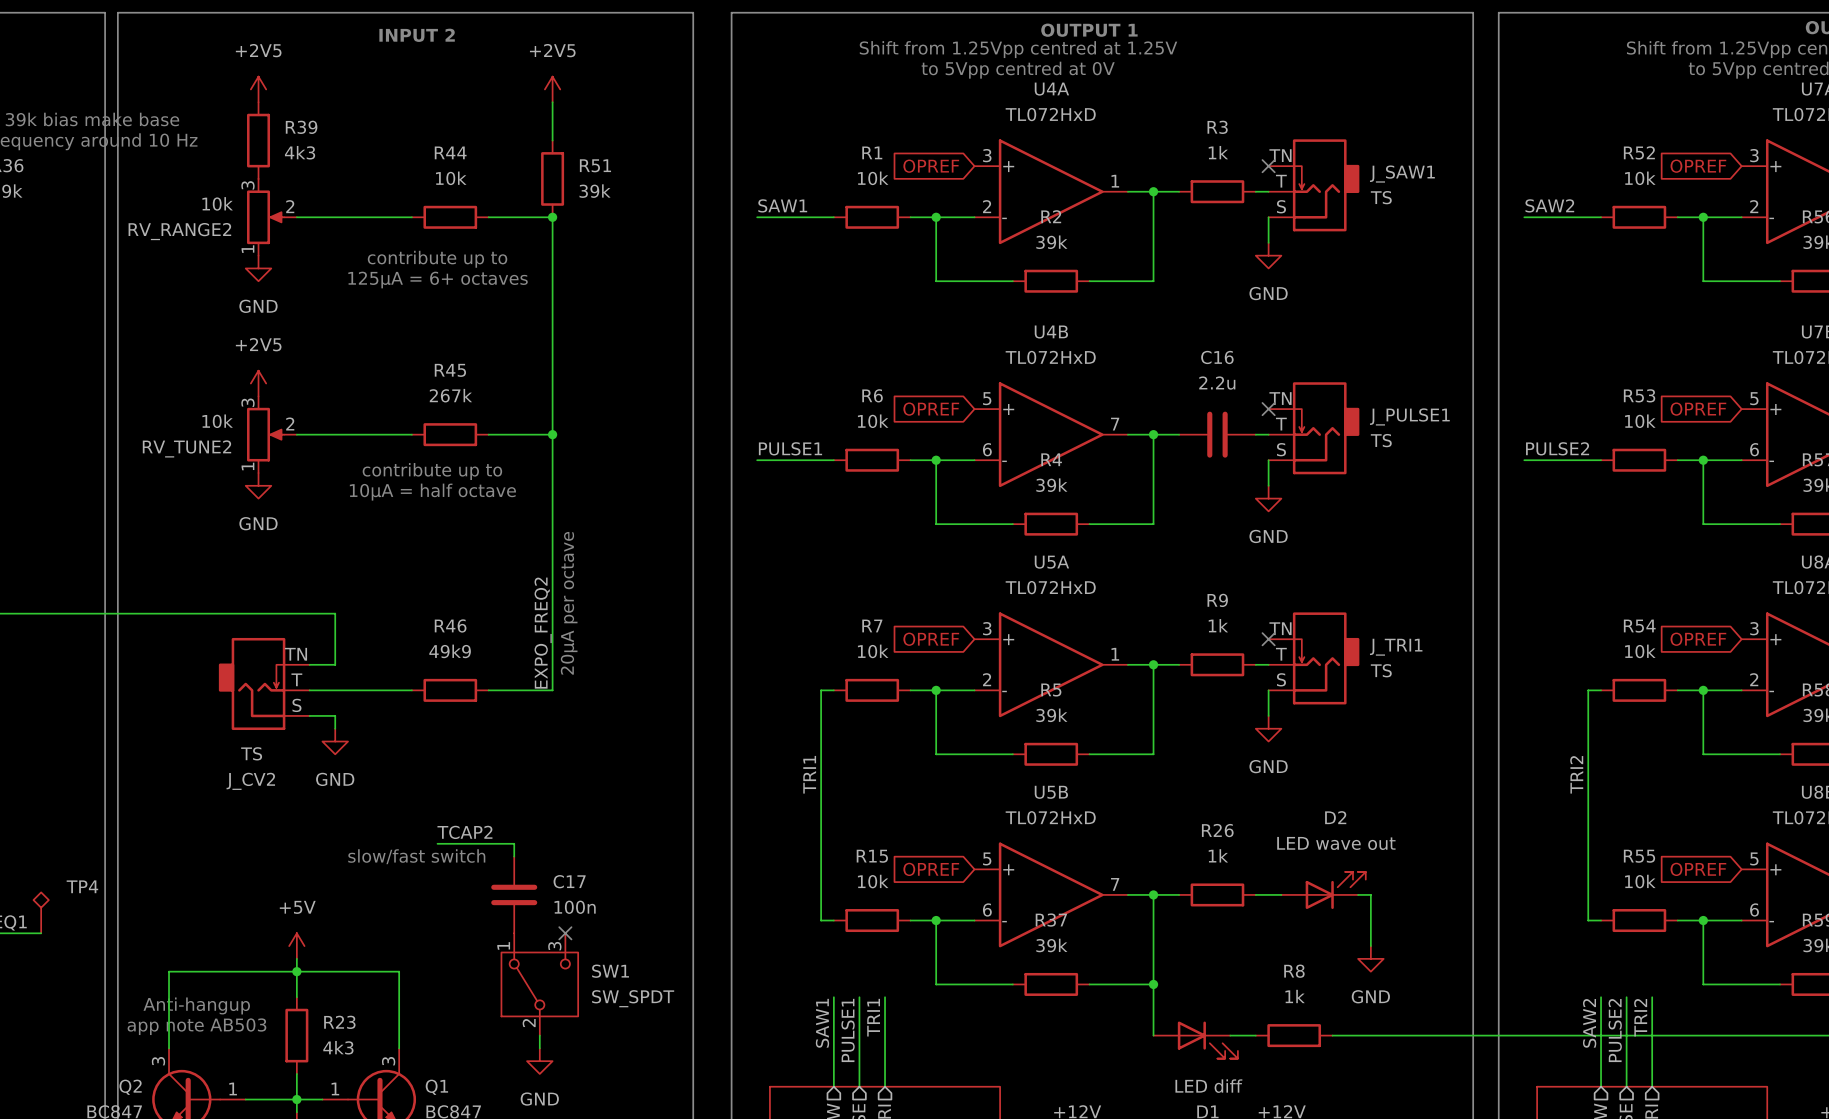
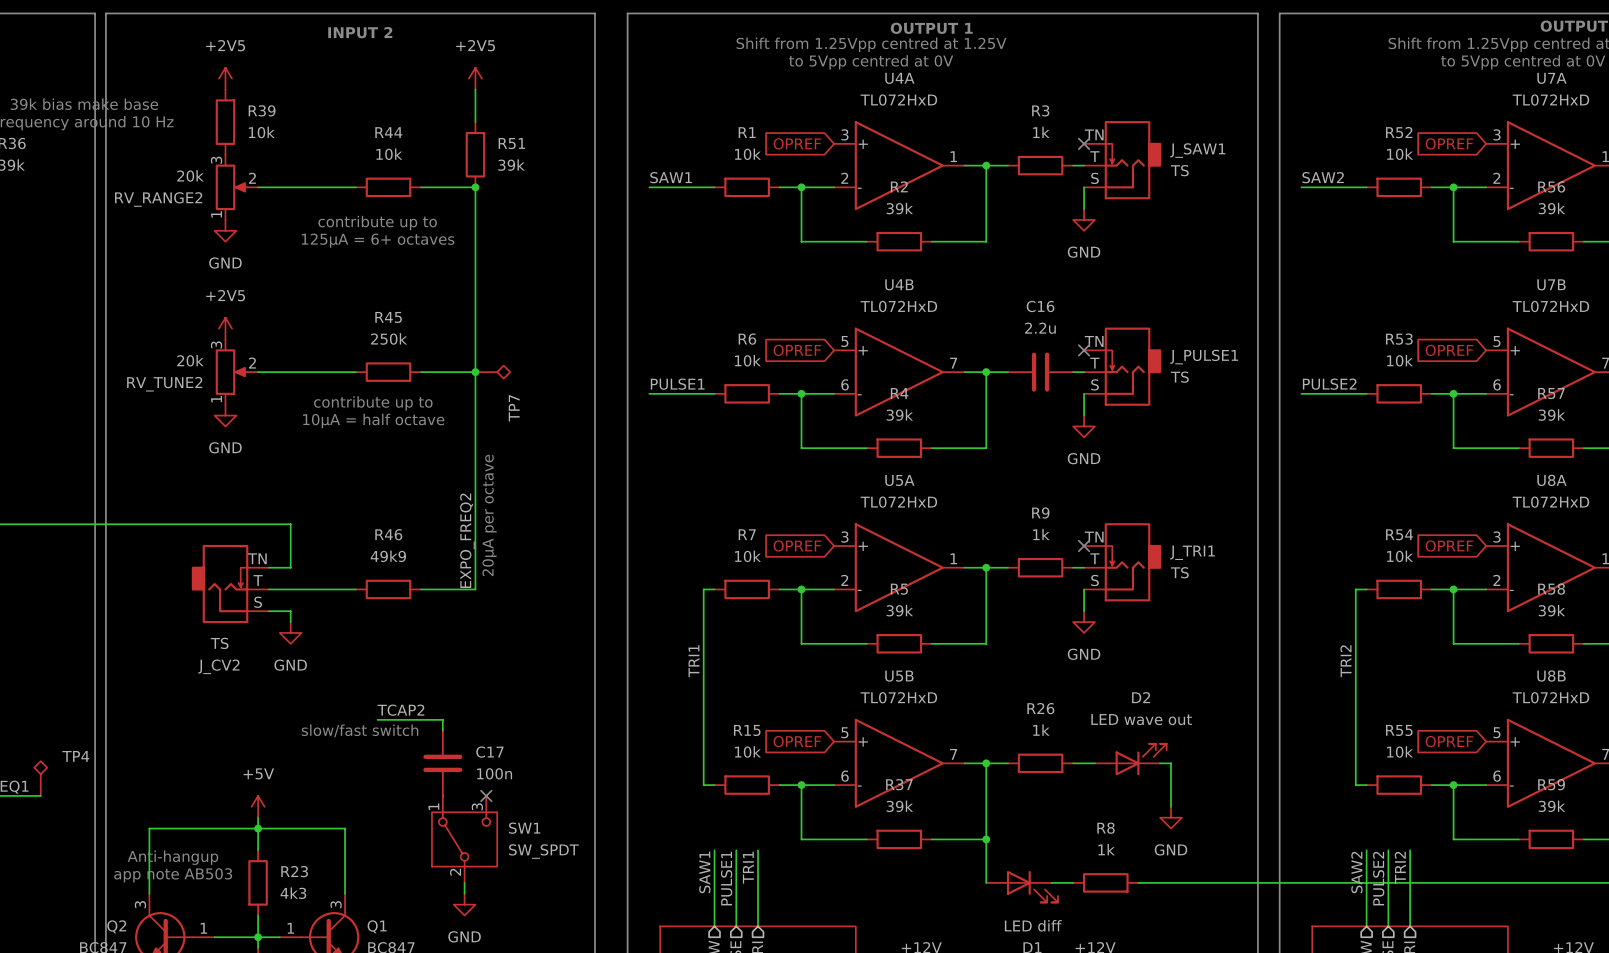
R39 value: 4k3 (300, 152) -> 10k (261, 132)
RV_RANGE2 value: 10k (217, 203) -> 20k (190, 175)
R45 value: 267k (450, 395) -> 250k (389, 338)
RV_TUNE2 value: 10k (217, 421) -> 20k (190, 360)
TP7: none -> (492, 372)

